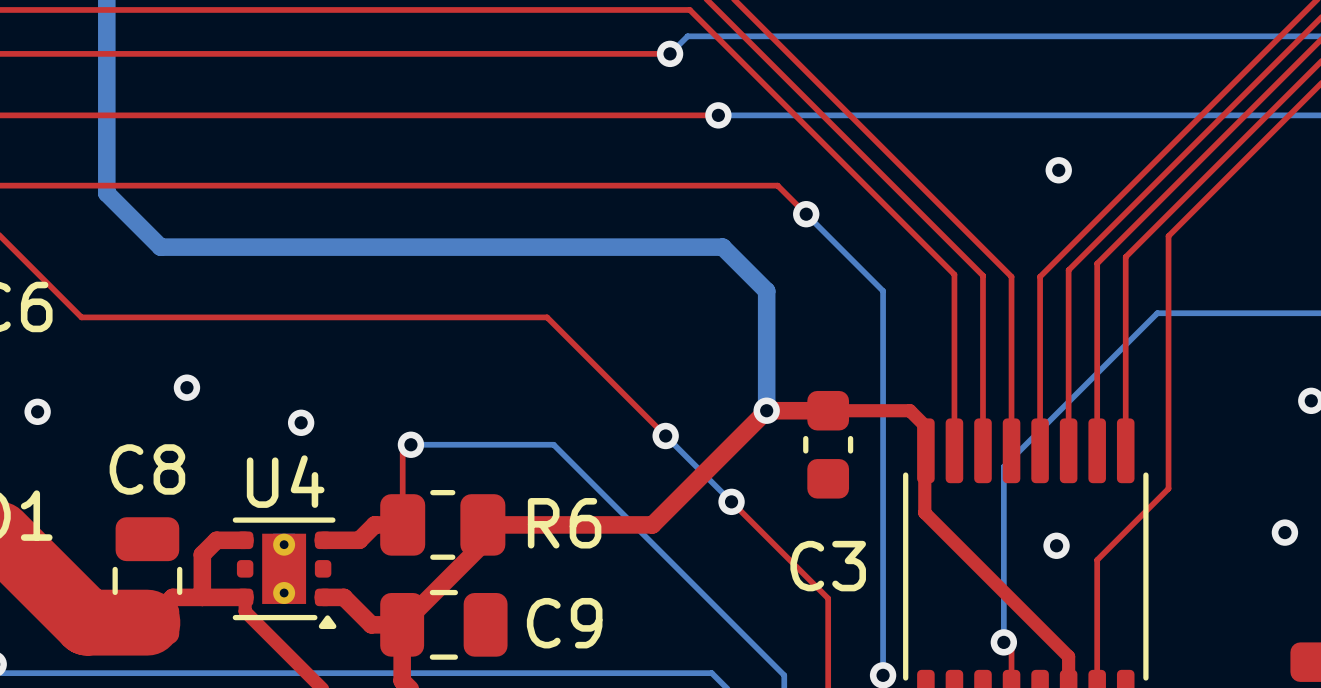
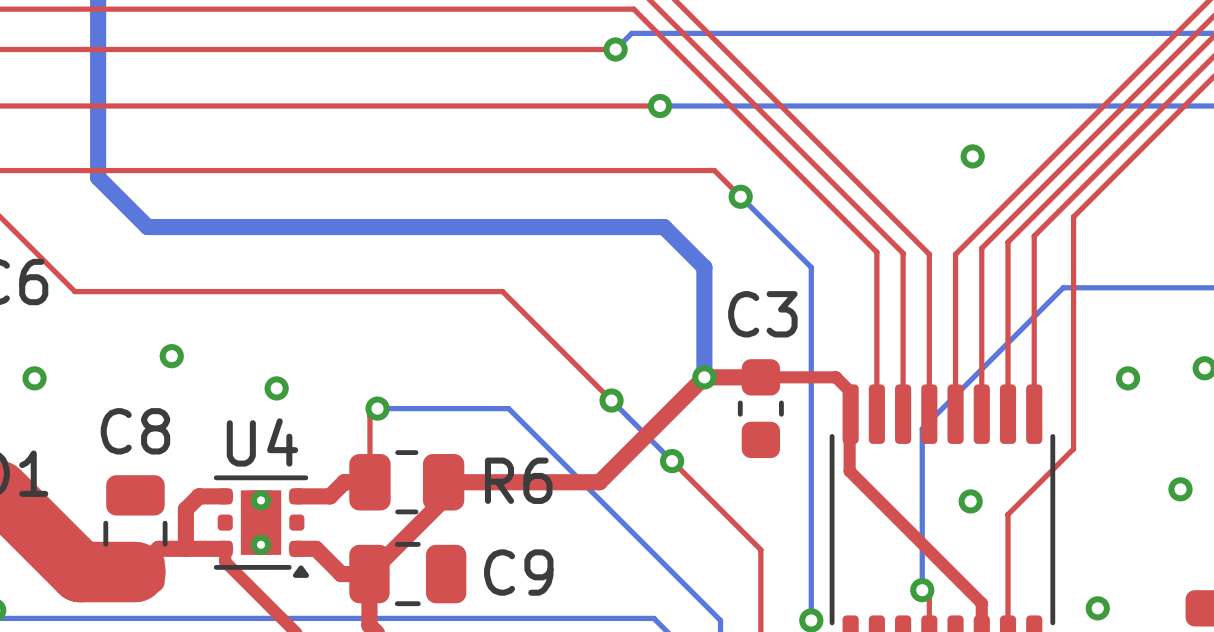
via: none -> (1128, 378)
C3 name position: C3 (828, 566) -> C3 (762, 314)
via: none -> (1097, 608)

